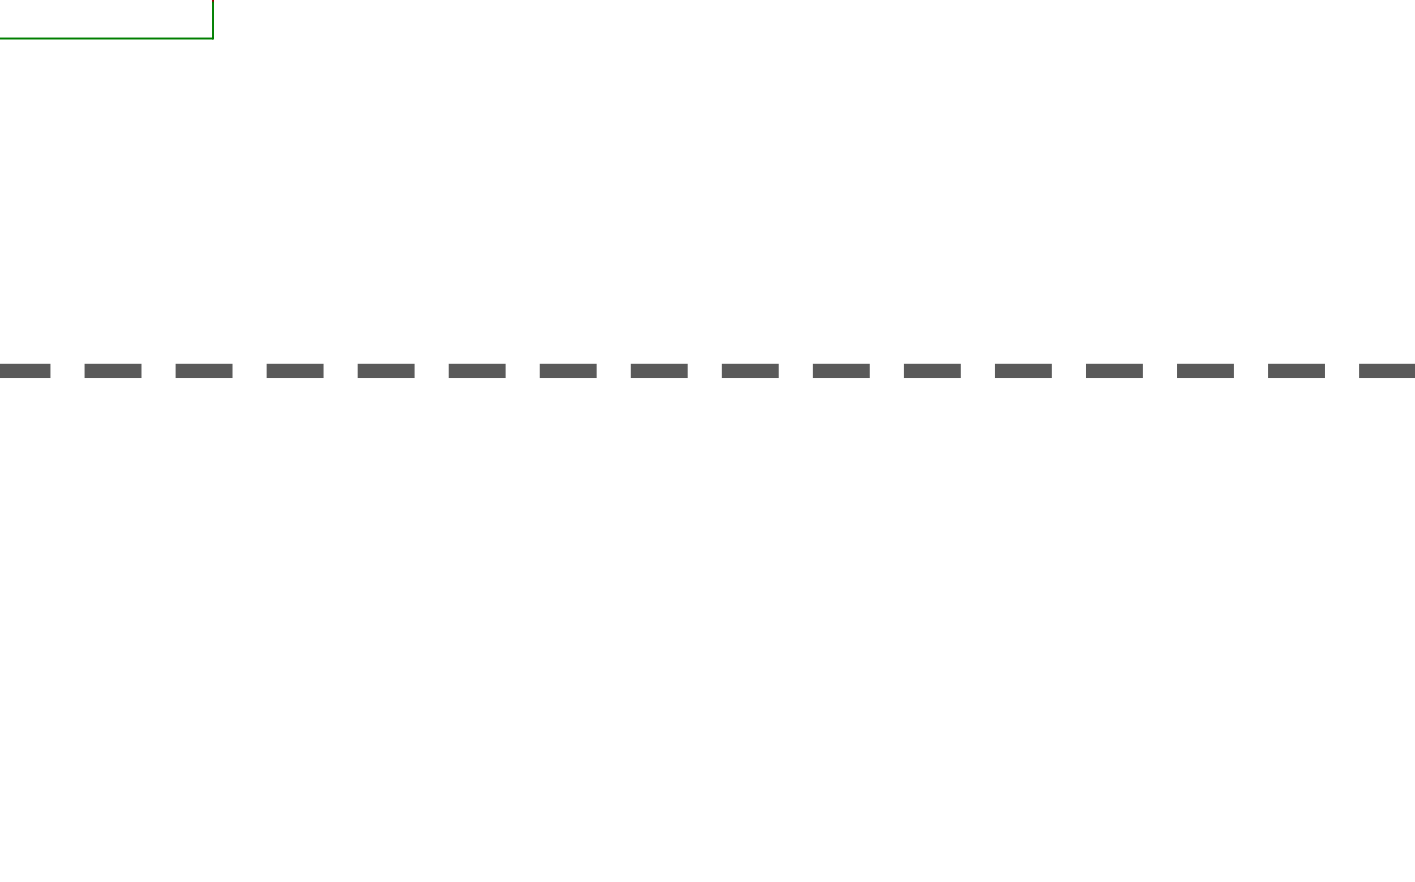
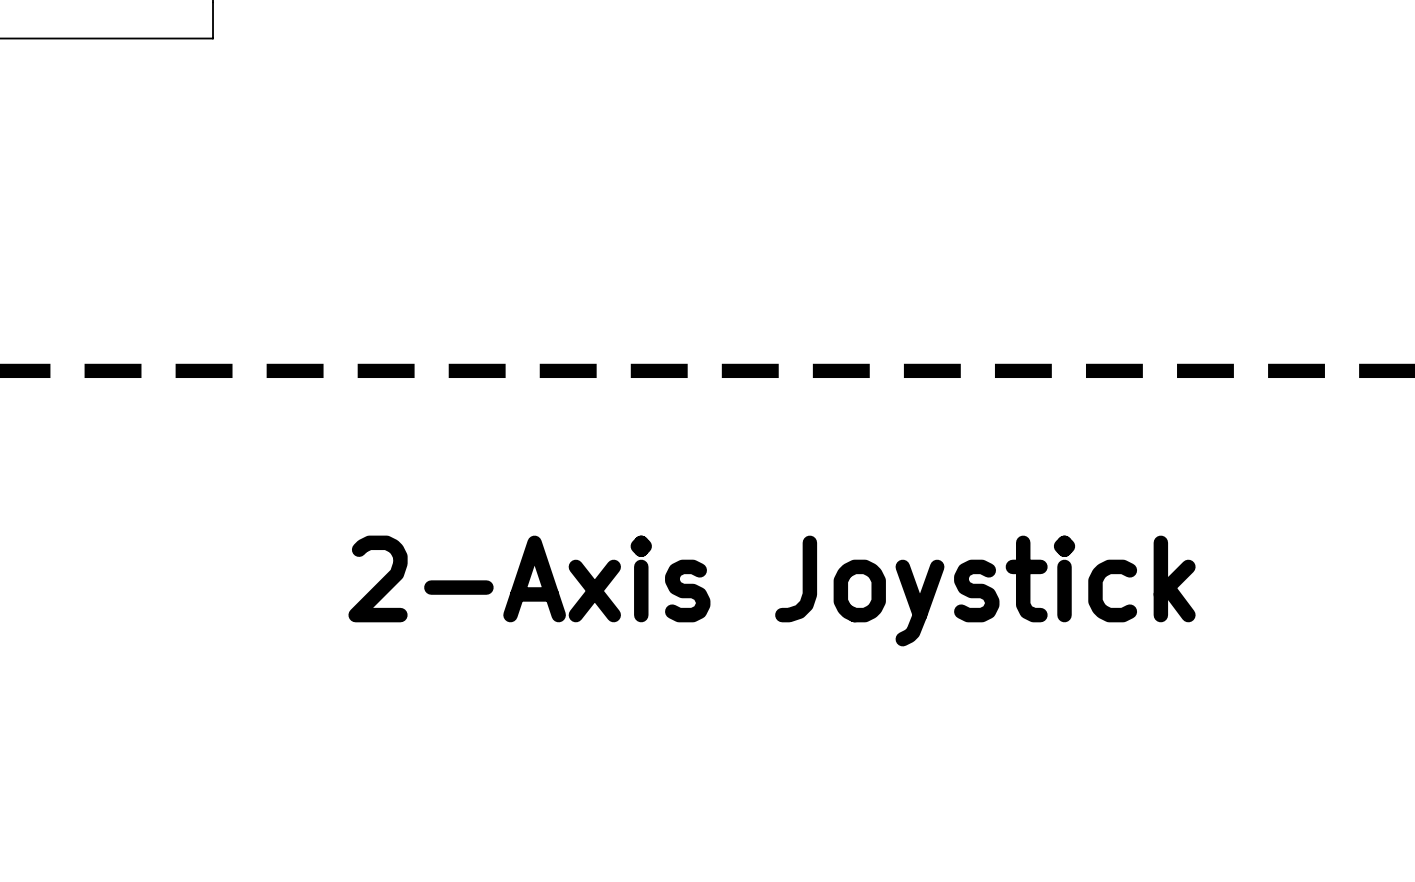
text: none -> 2-Axis Joystick (772, 591)

